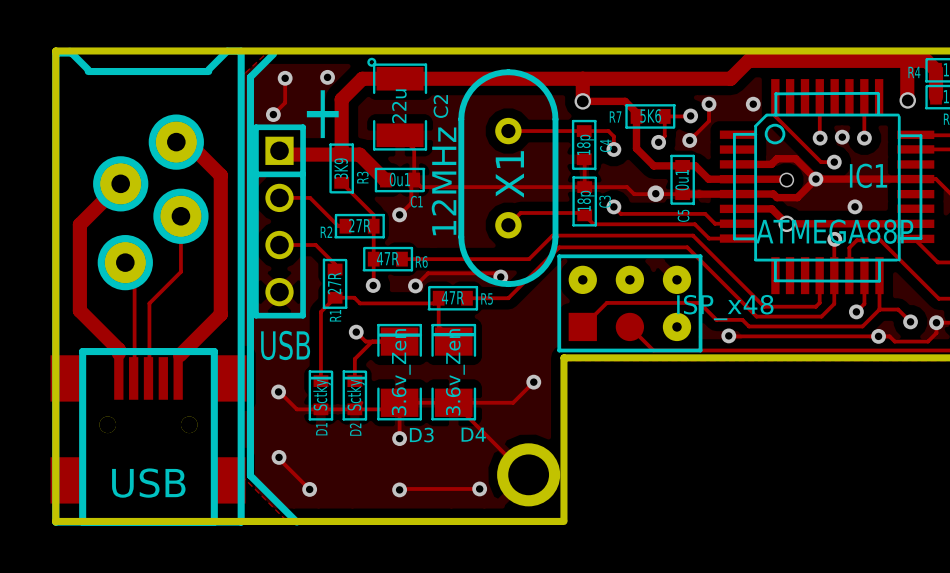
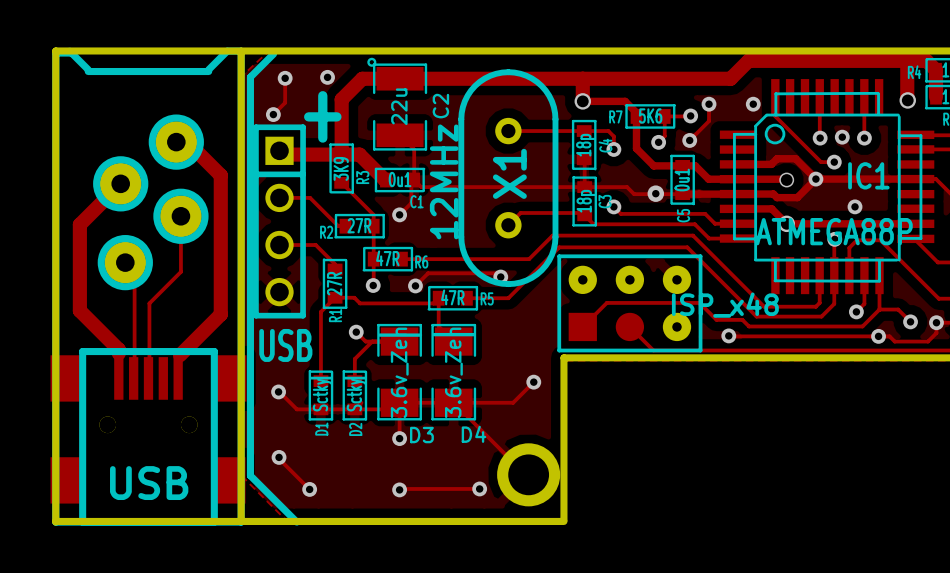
board edge: none -> (241, 51) (241, 520)

